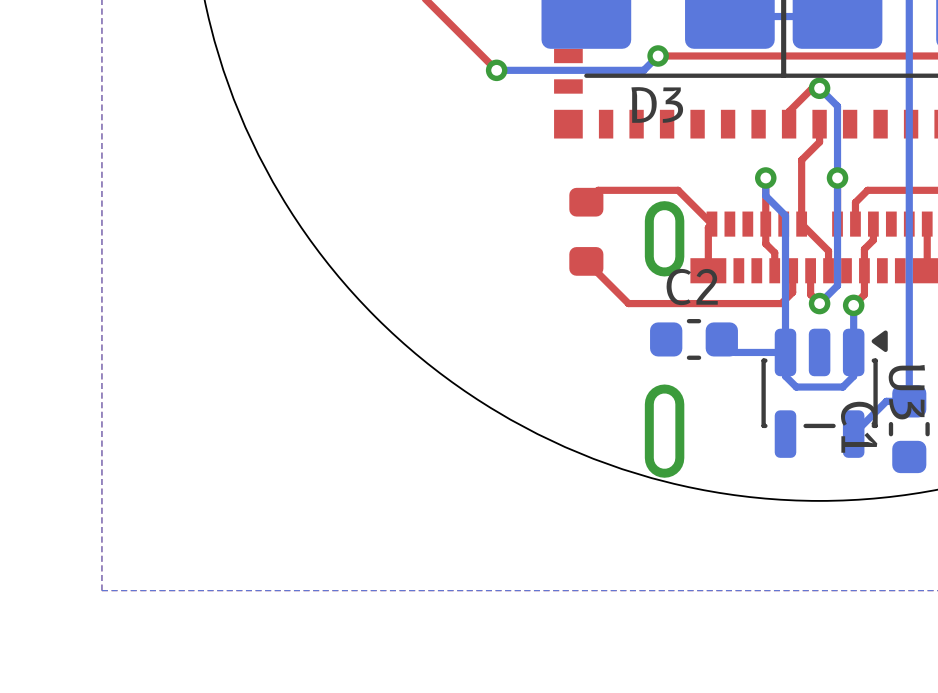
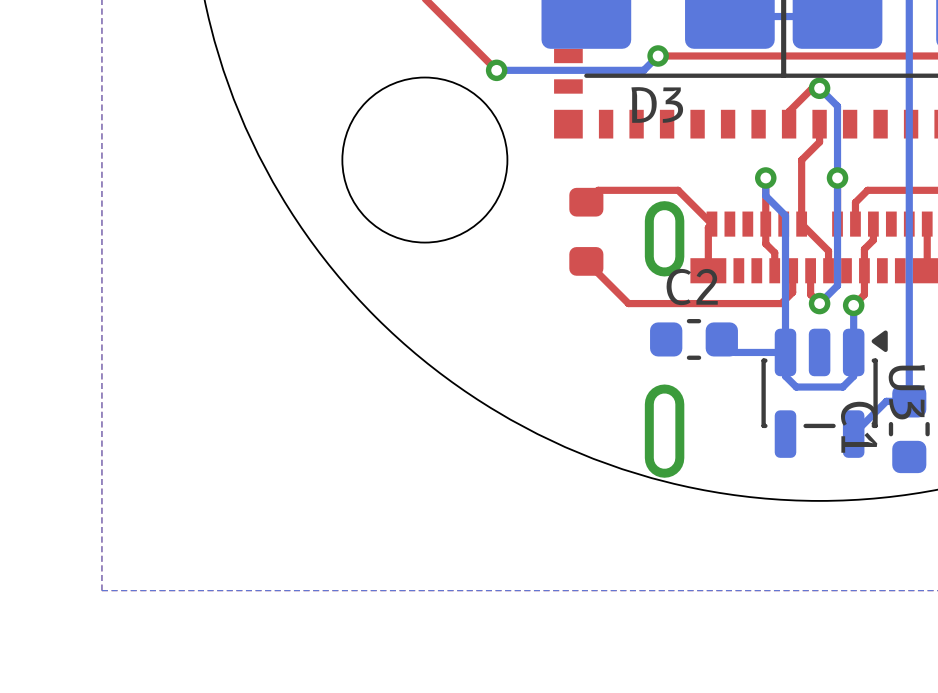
round board edge: none -> [341, 76, 509, 244]

